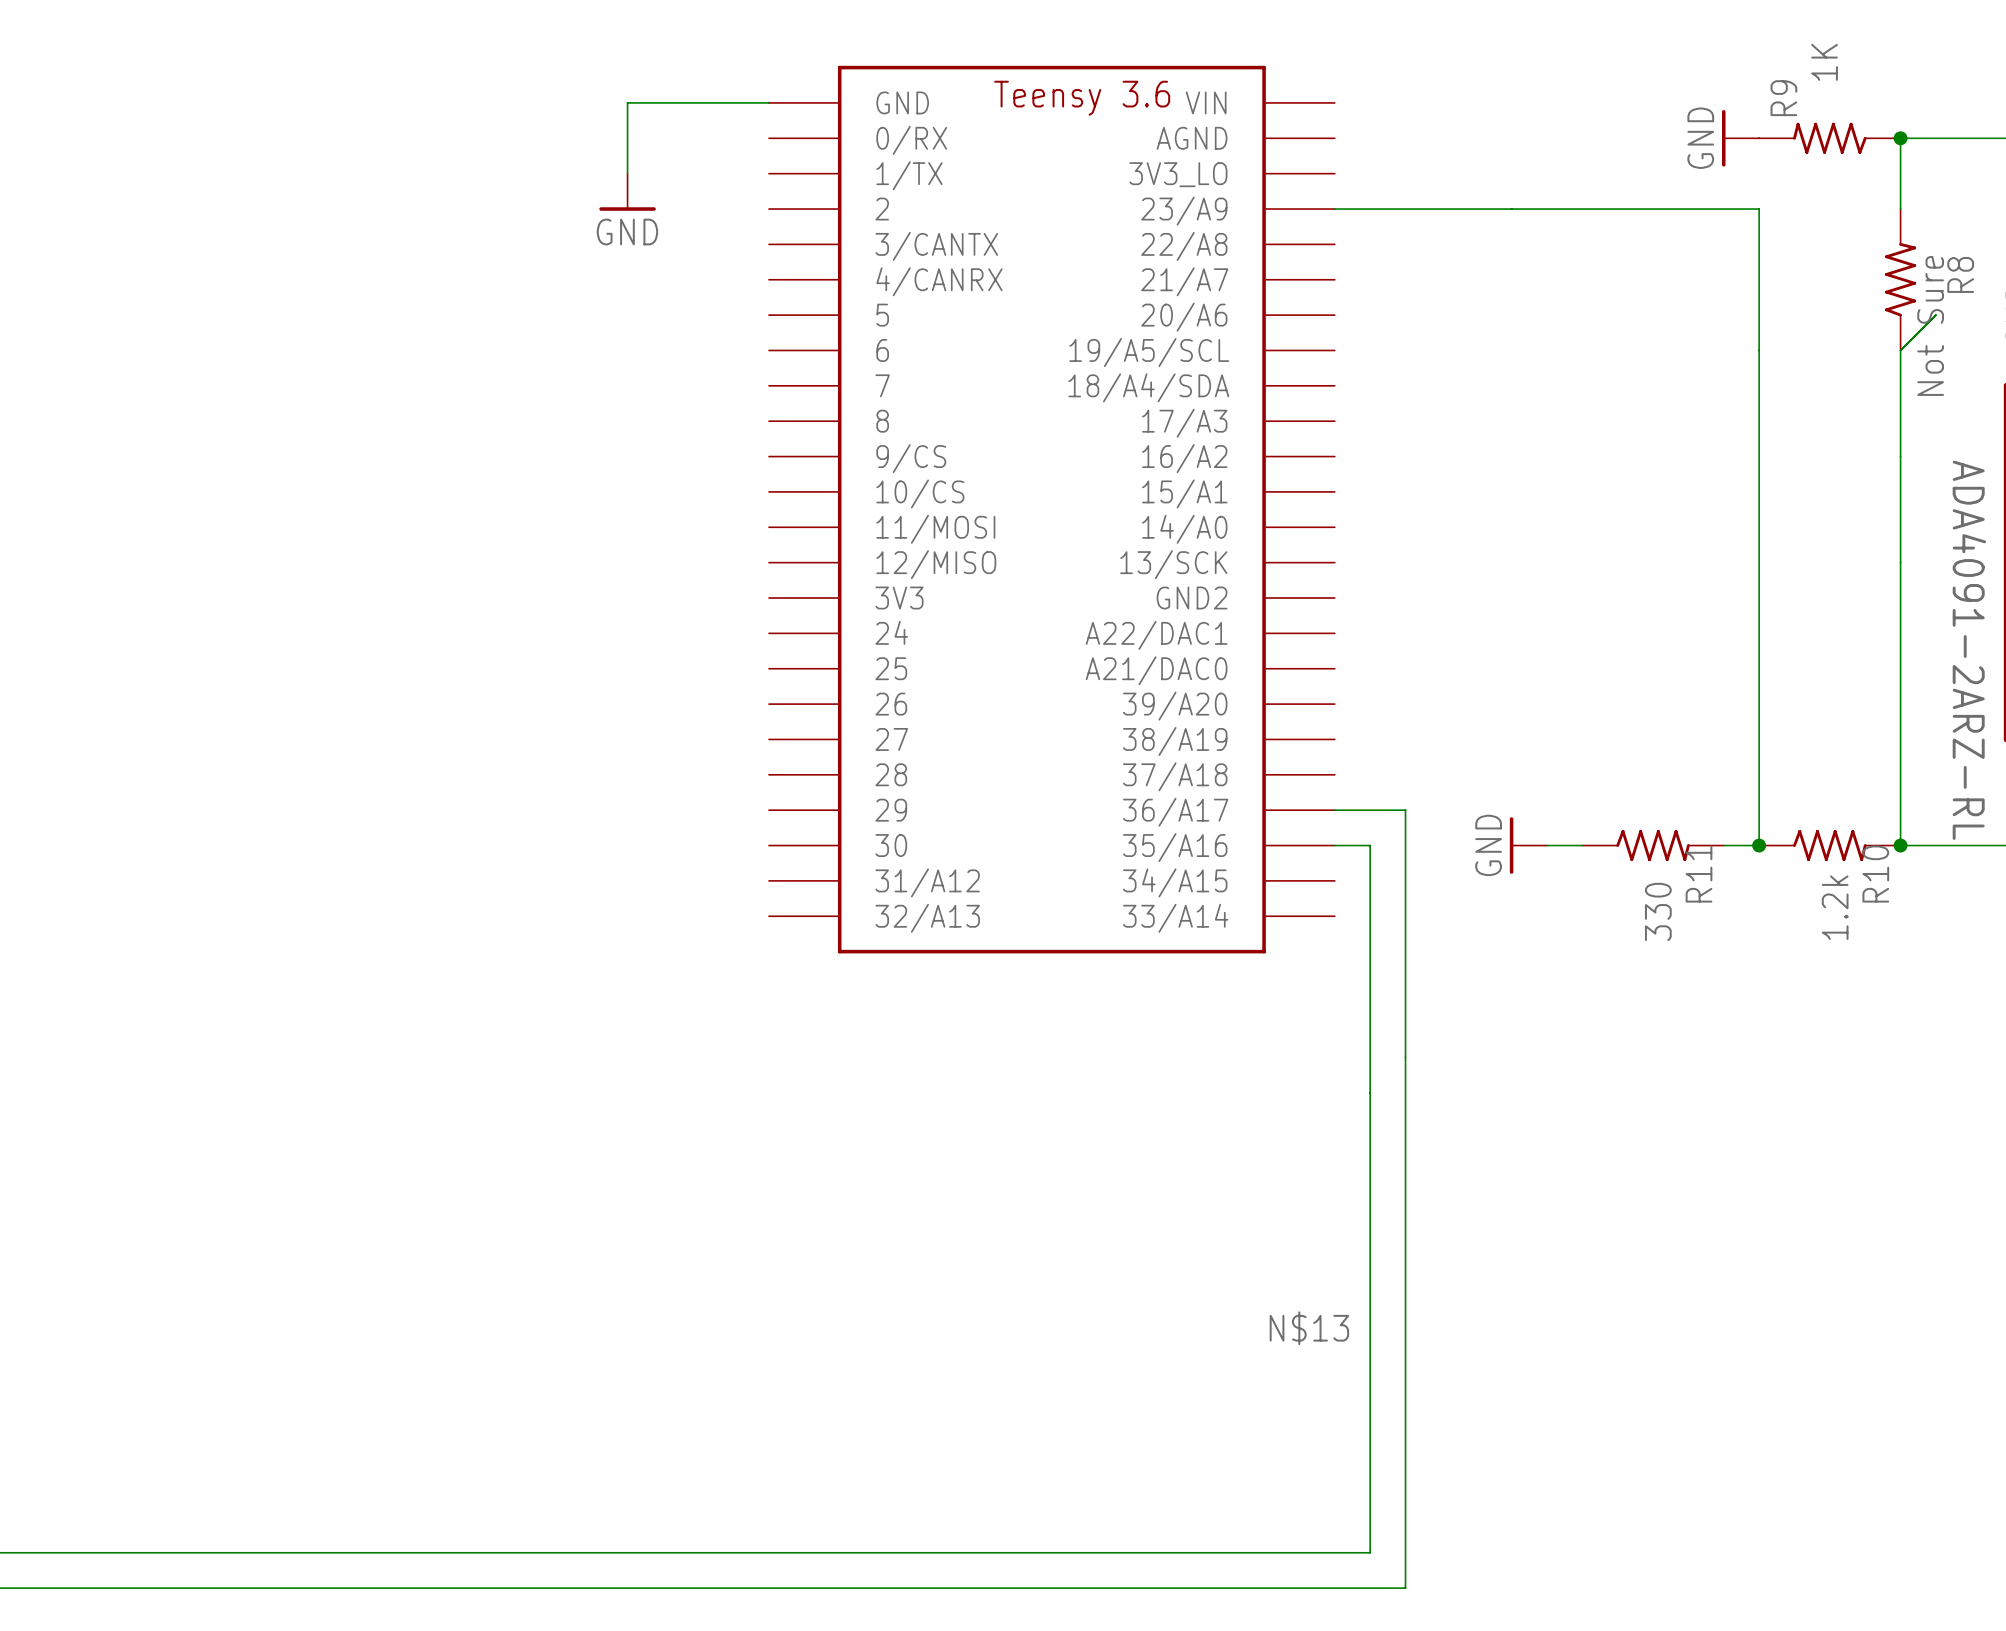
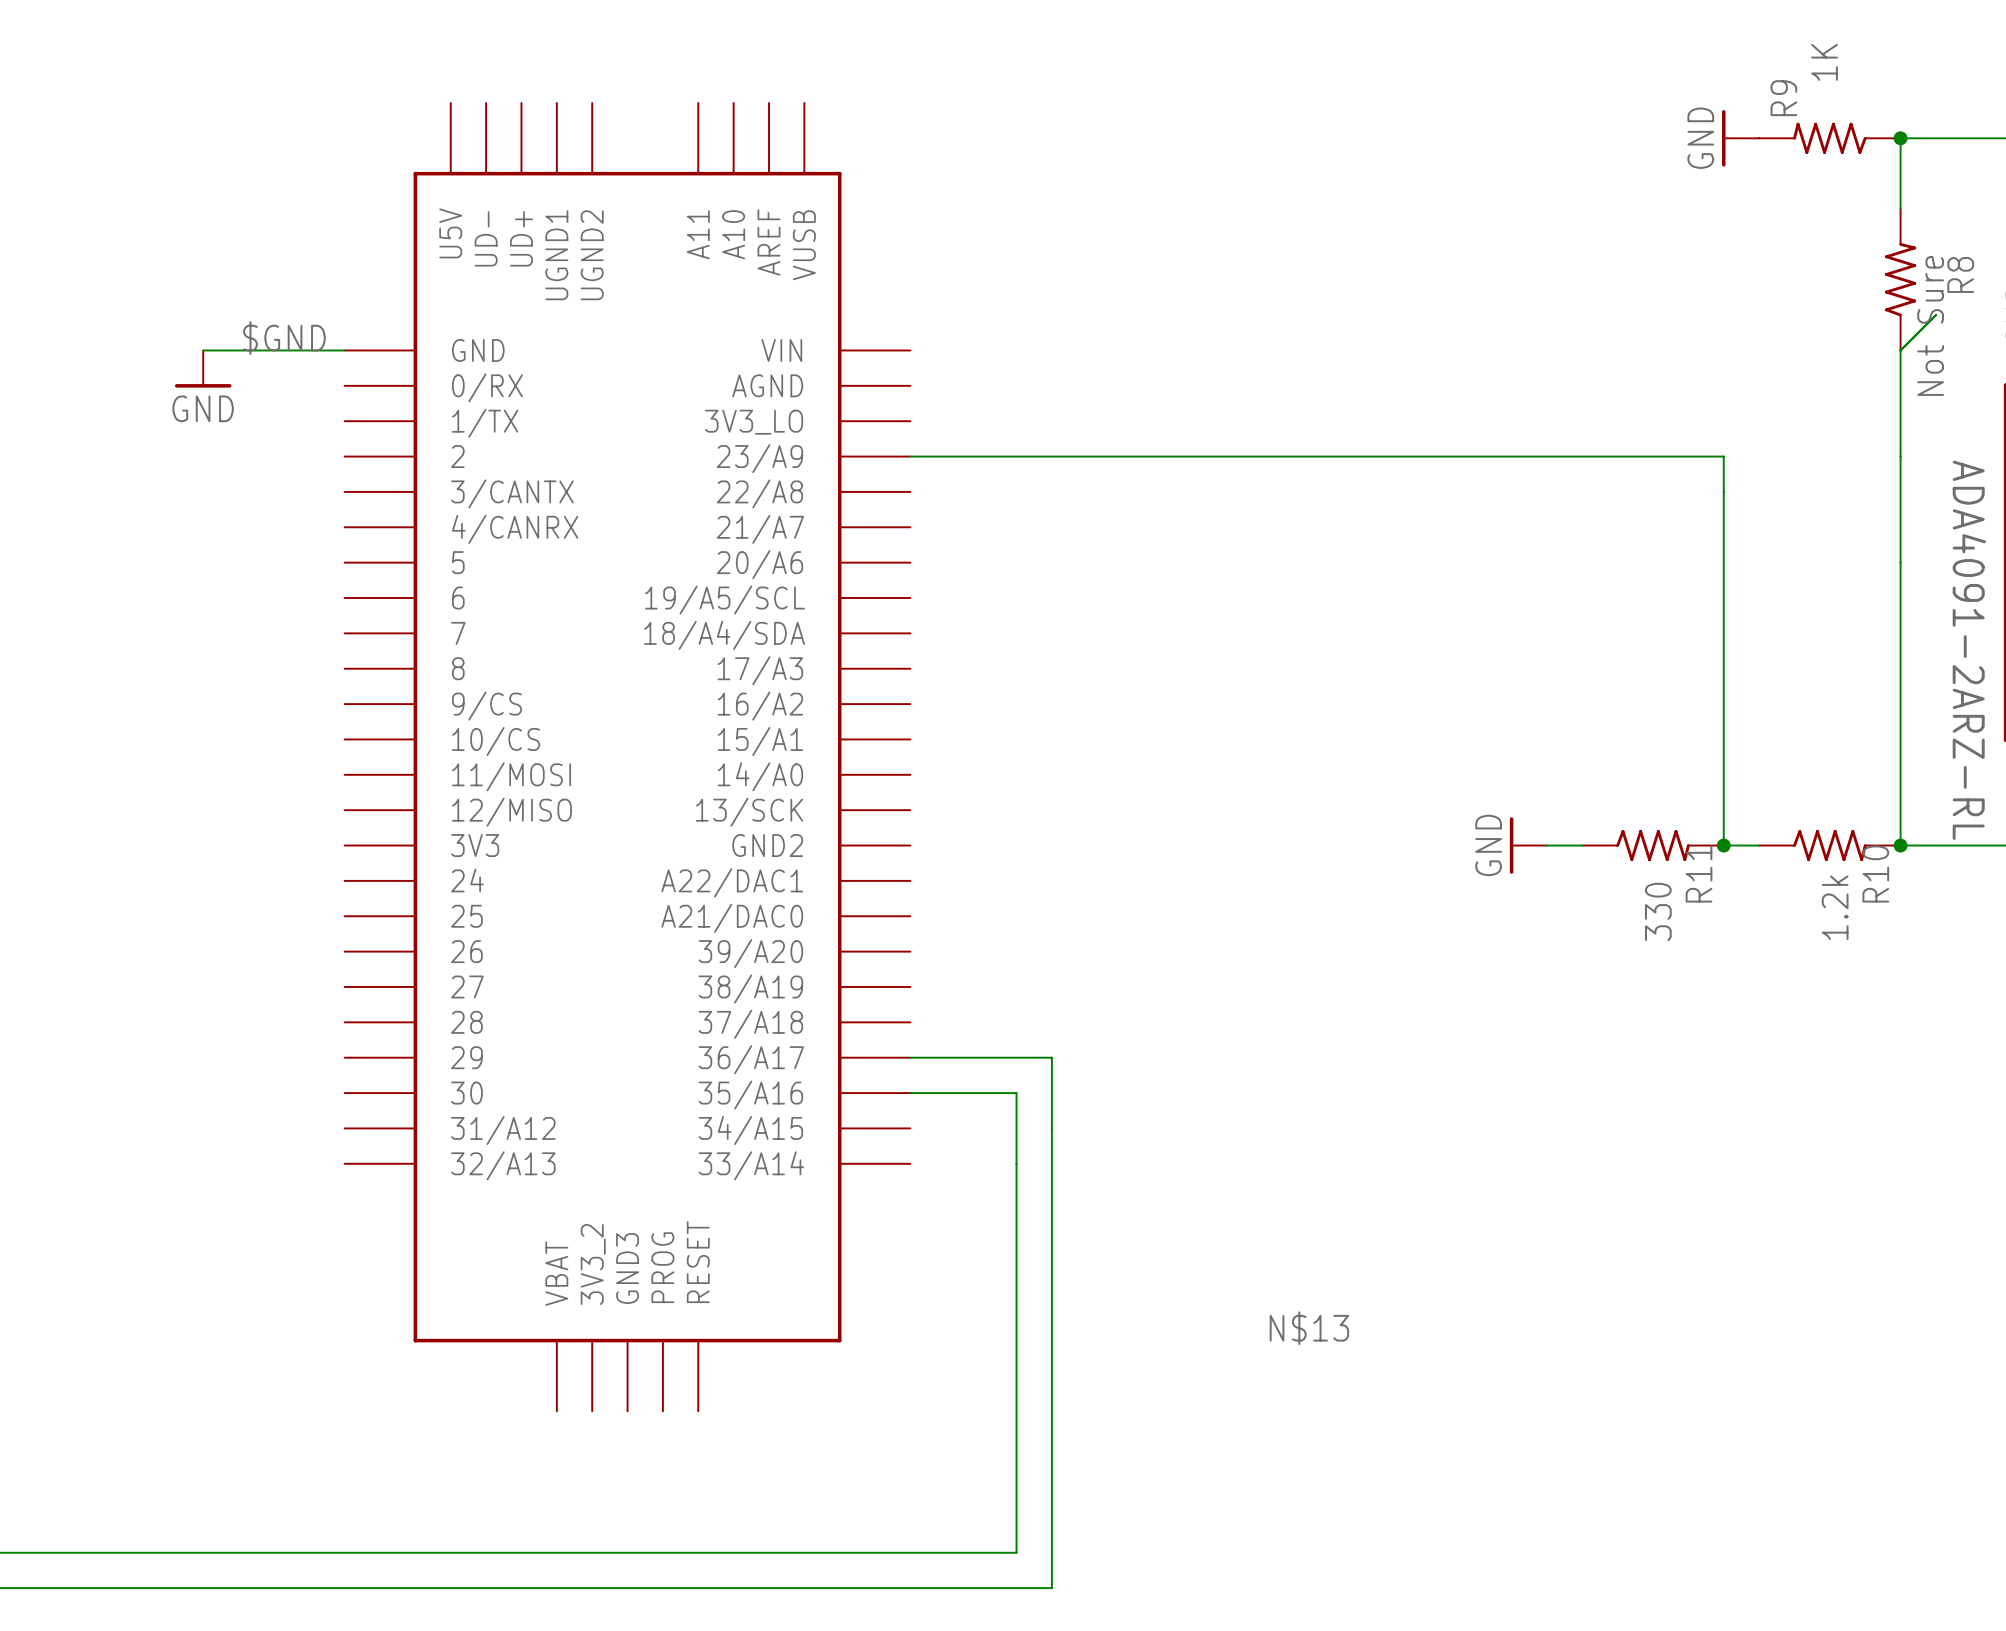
wire: (769, 102) (627, 102) (627, 173) -> none
power symbol: GND (627, 192) -> none
wire: (1334, 209) (1759, 209) (1759, 845) -> none
label: none -> $GND (284, 338)
wire: none -> (203, 350) (344, 350)
power symbol: none -> GND (203, 369)
wire: none -> (910, 456) (1723, 456) (1723, 845)
part: (1051, 509) -> none
part: none -> (627, 757)
wire: (1334, 810) (1405, 810) (1405, 1588) (1051, 1588) -> (910, 1057) (1051, 1057) (1051, 1588)
wire: (1334, 845) (1370, 845) (1370, 1552) (1016, 1552) -> (910, 1093) (1016, 1093) (1016, 1552)
junction position: (1759, 845) -> (1723, 845)

